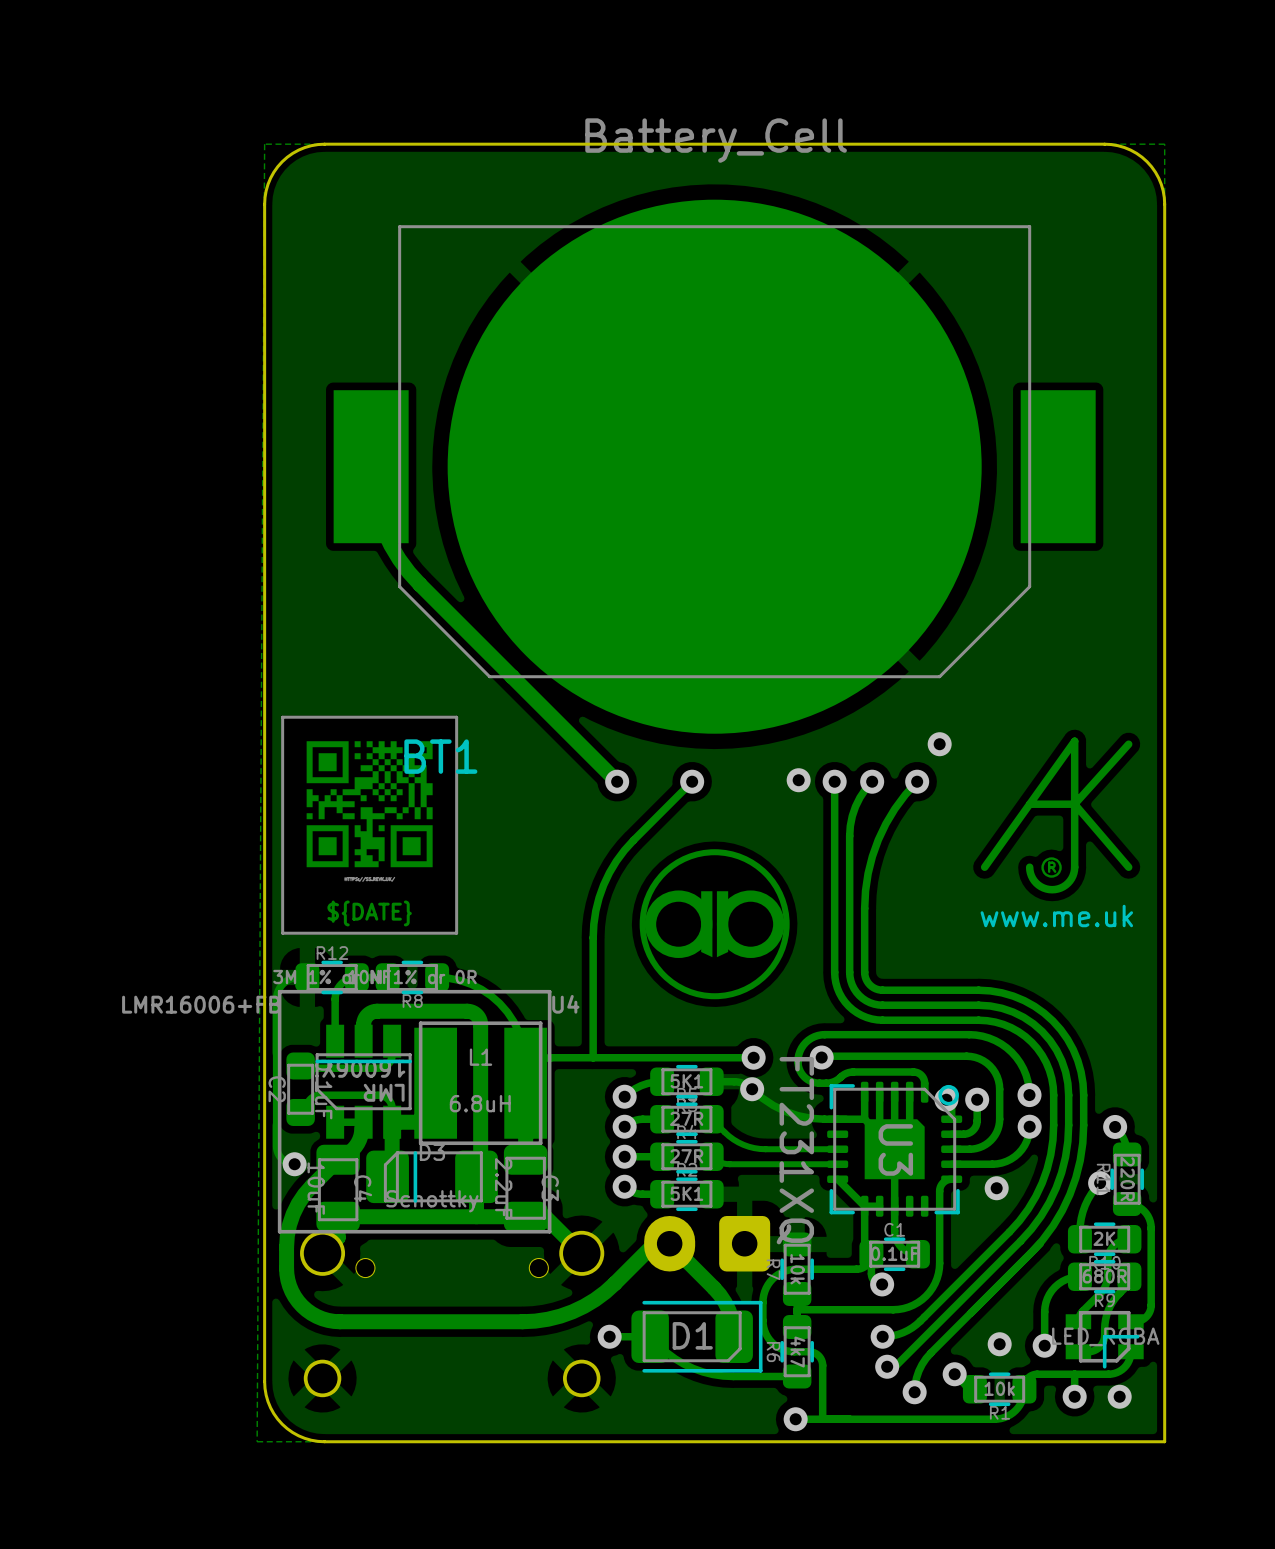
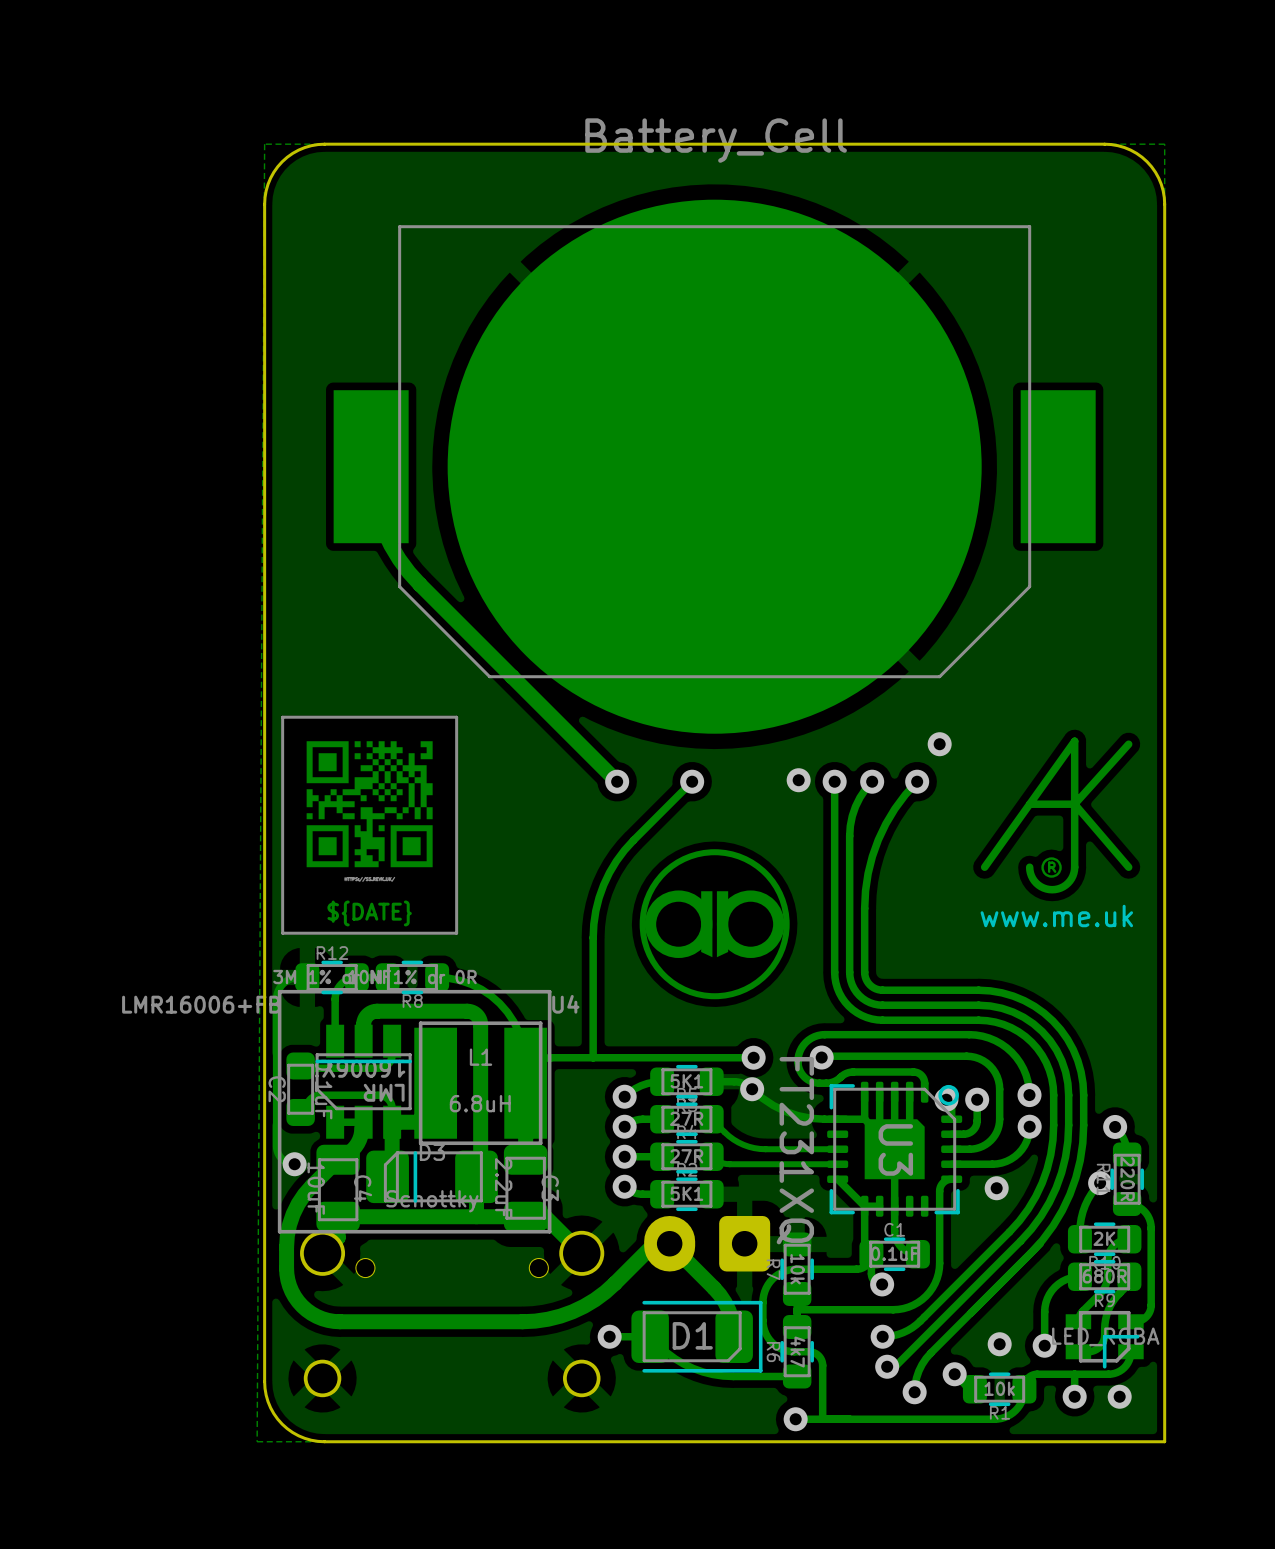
BT1 name: BT1 (440, 756) -> none

